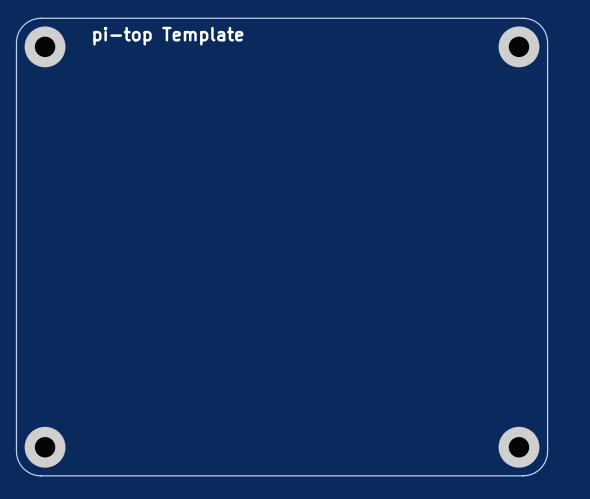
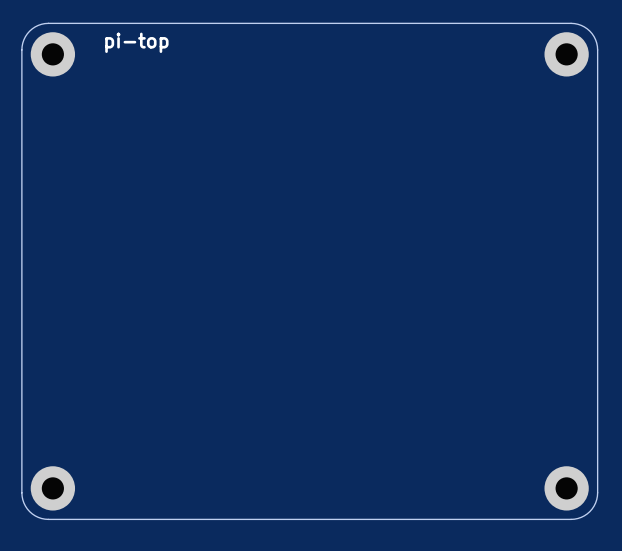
text: pi-top Template (168, 36) -> pi-top (136, 42)

